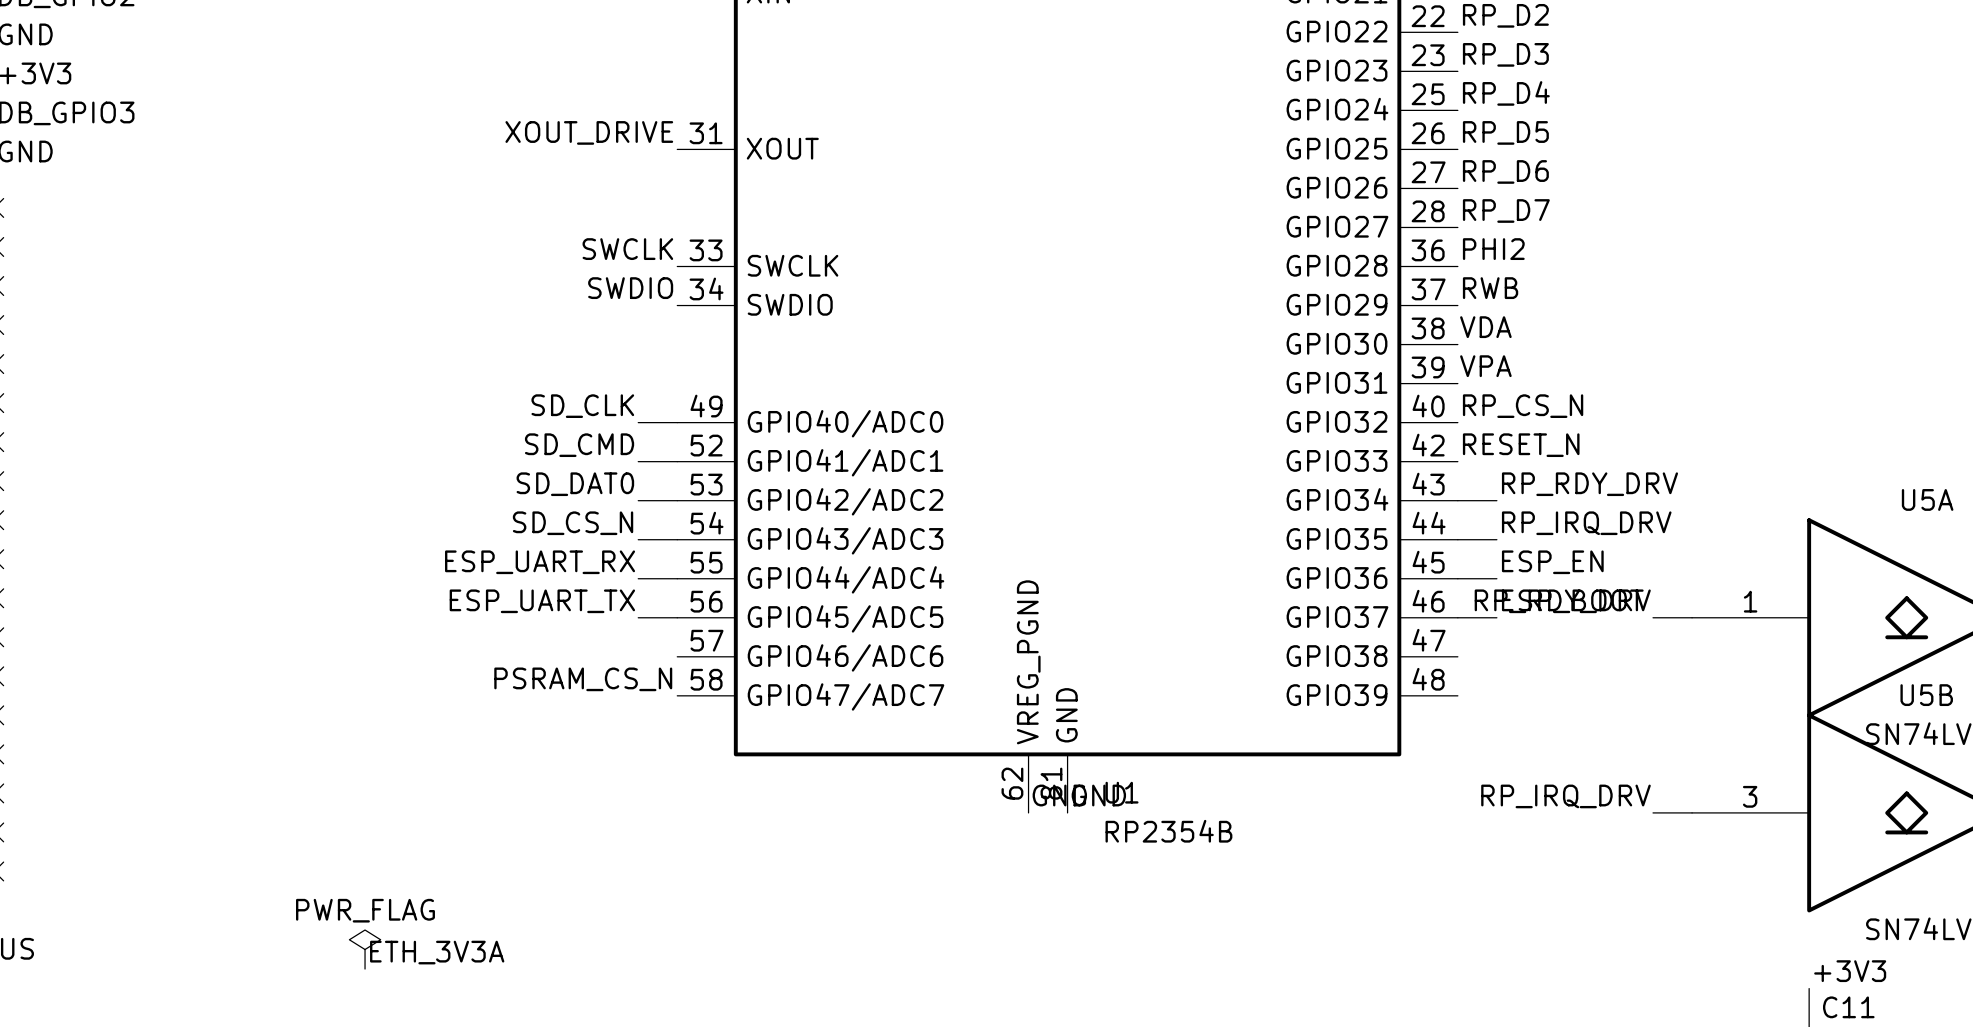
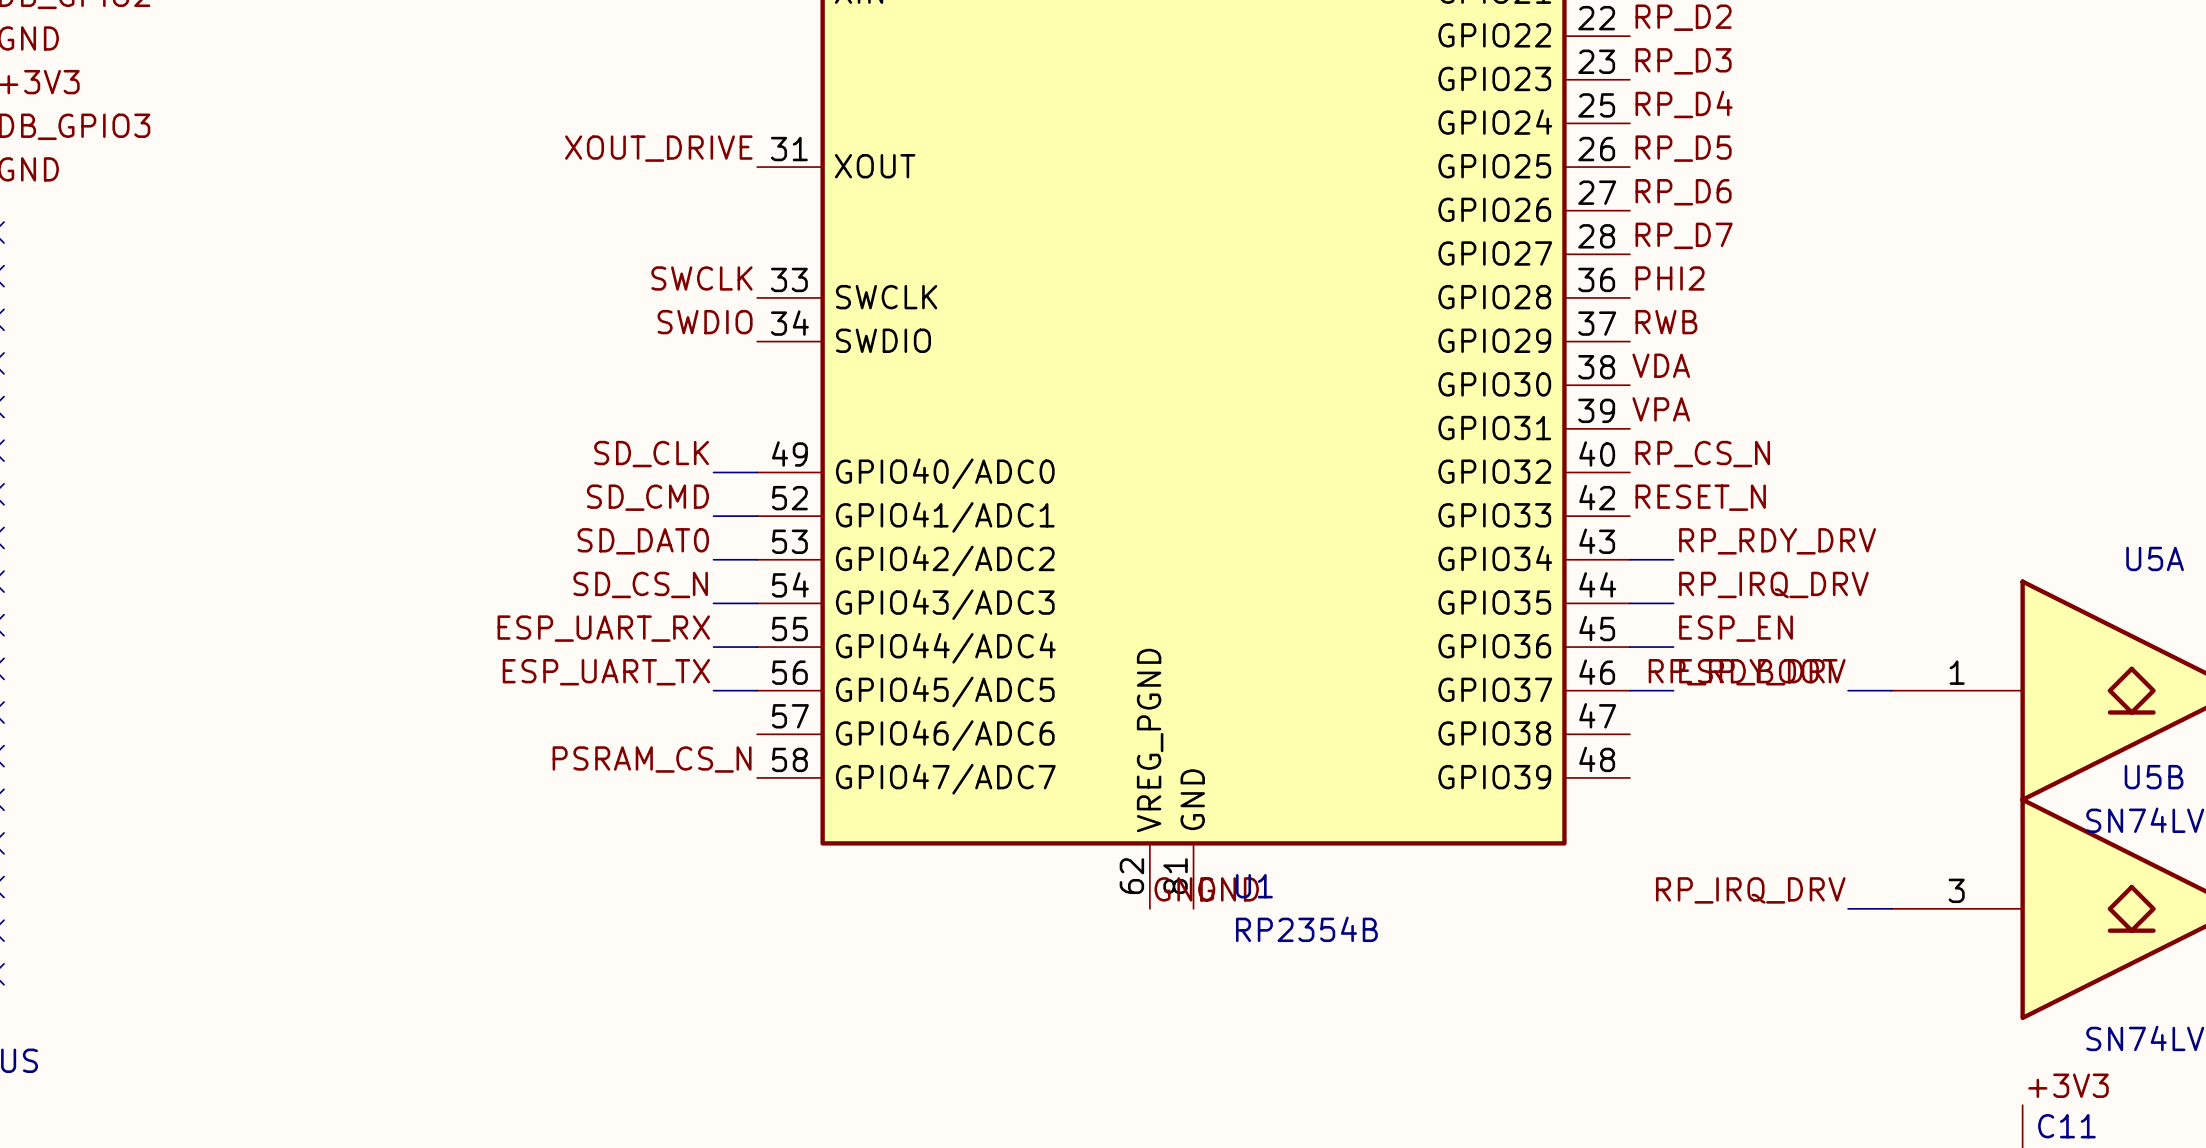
power symbol: PWR_FLAG (365, 949) -> none
label: ETH_3V3A (437, 952) -> none

